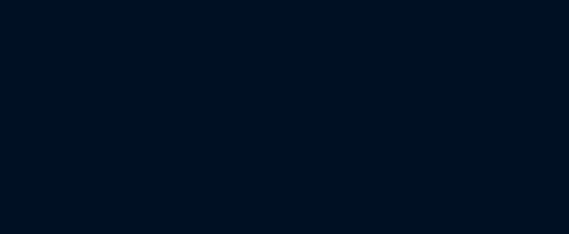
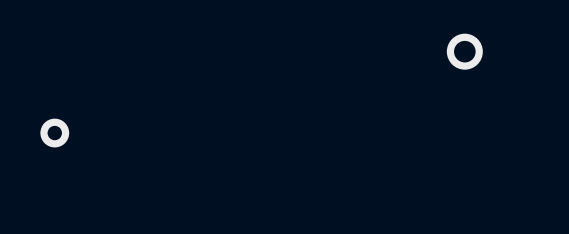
via: none -> (464, 51)
via: none -> (54, 133)

